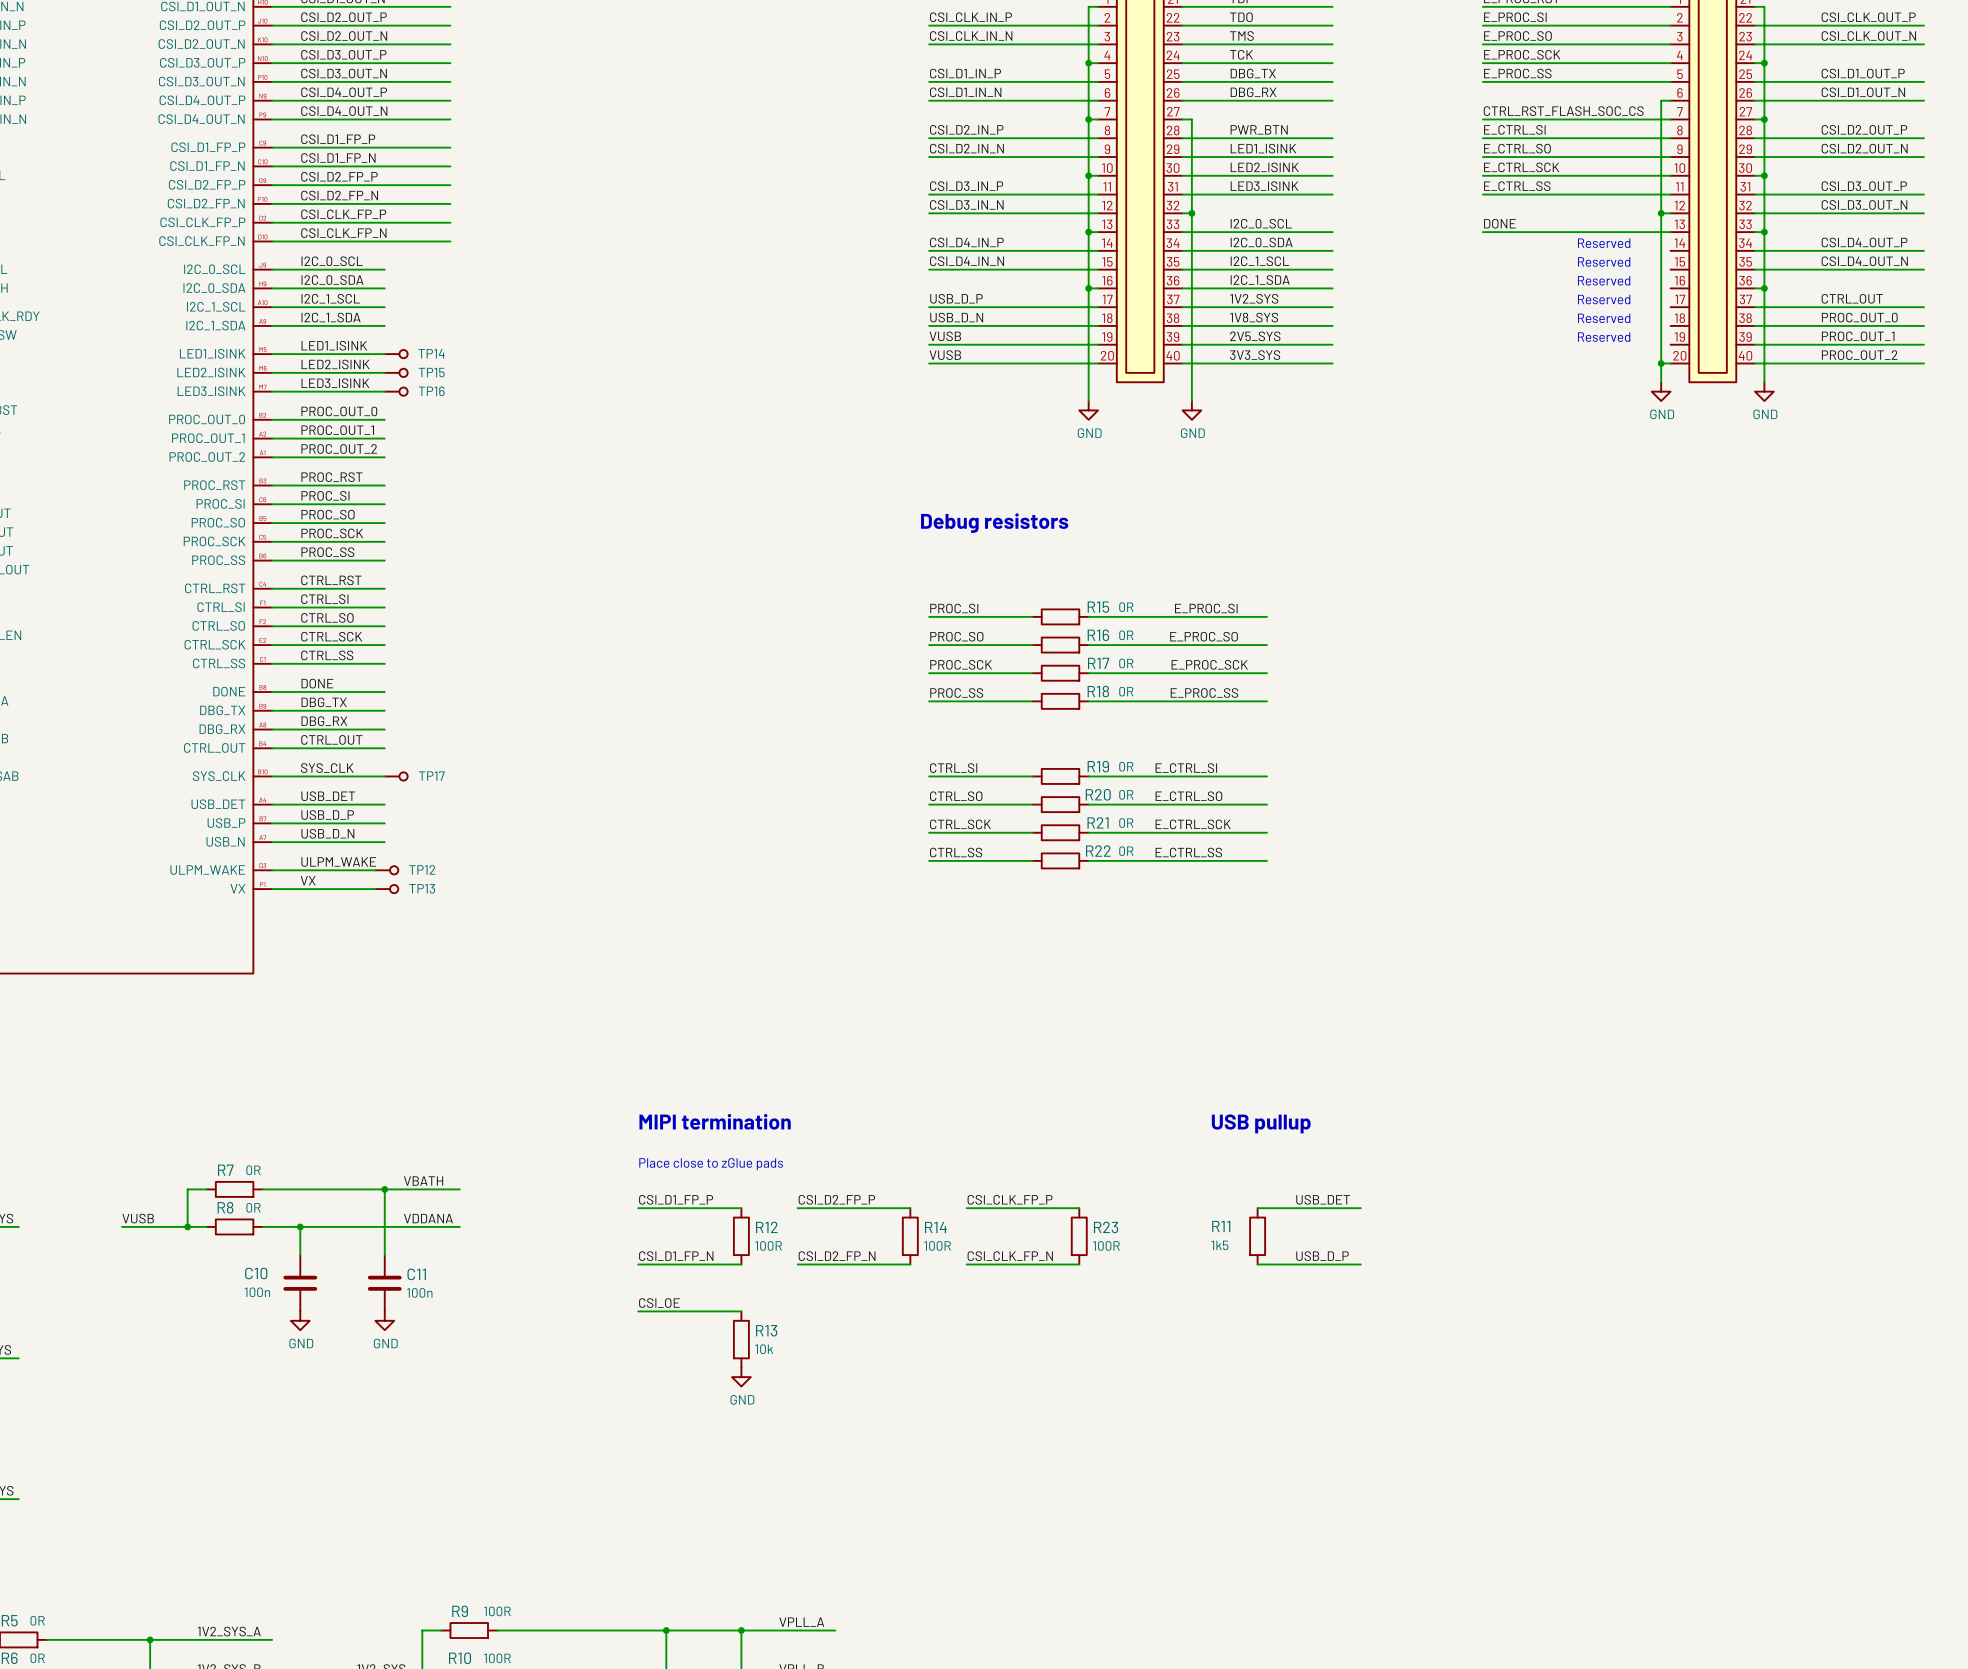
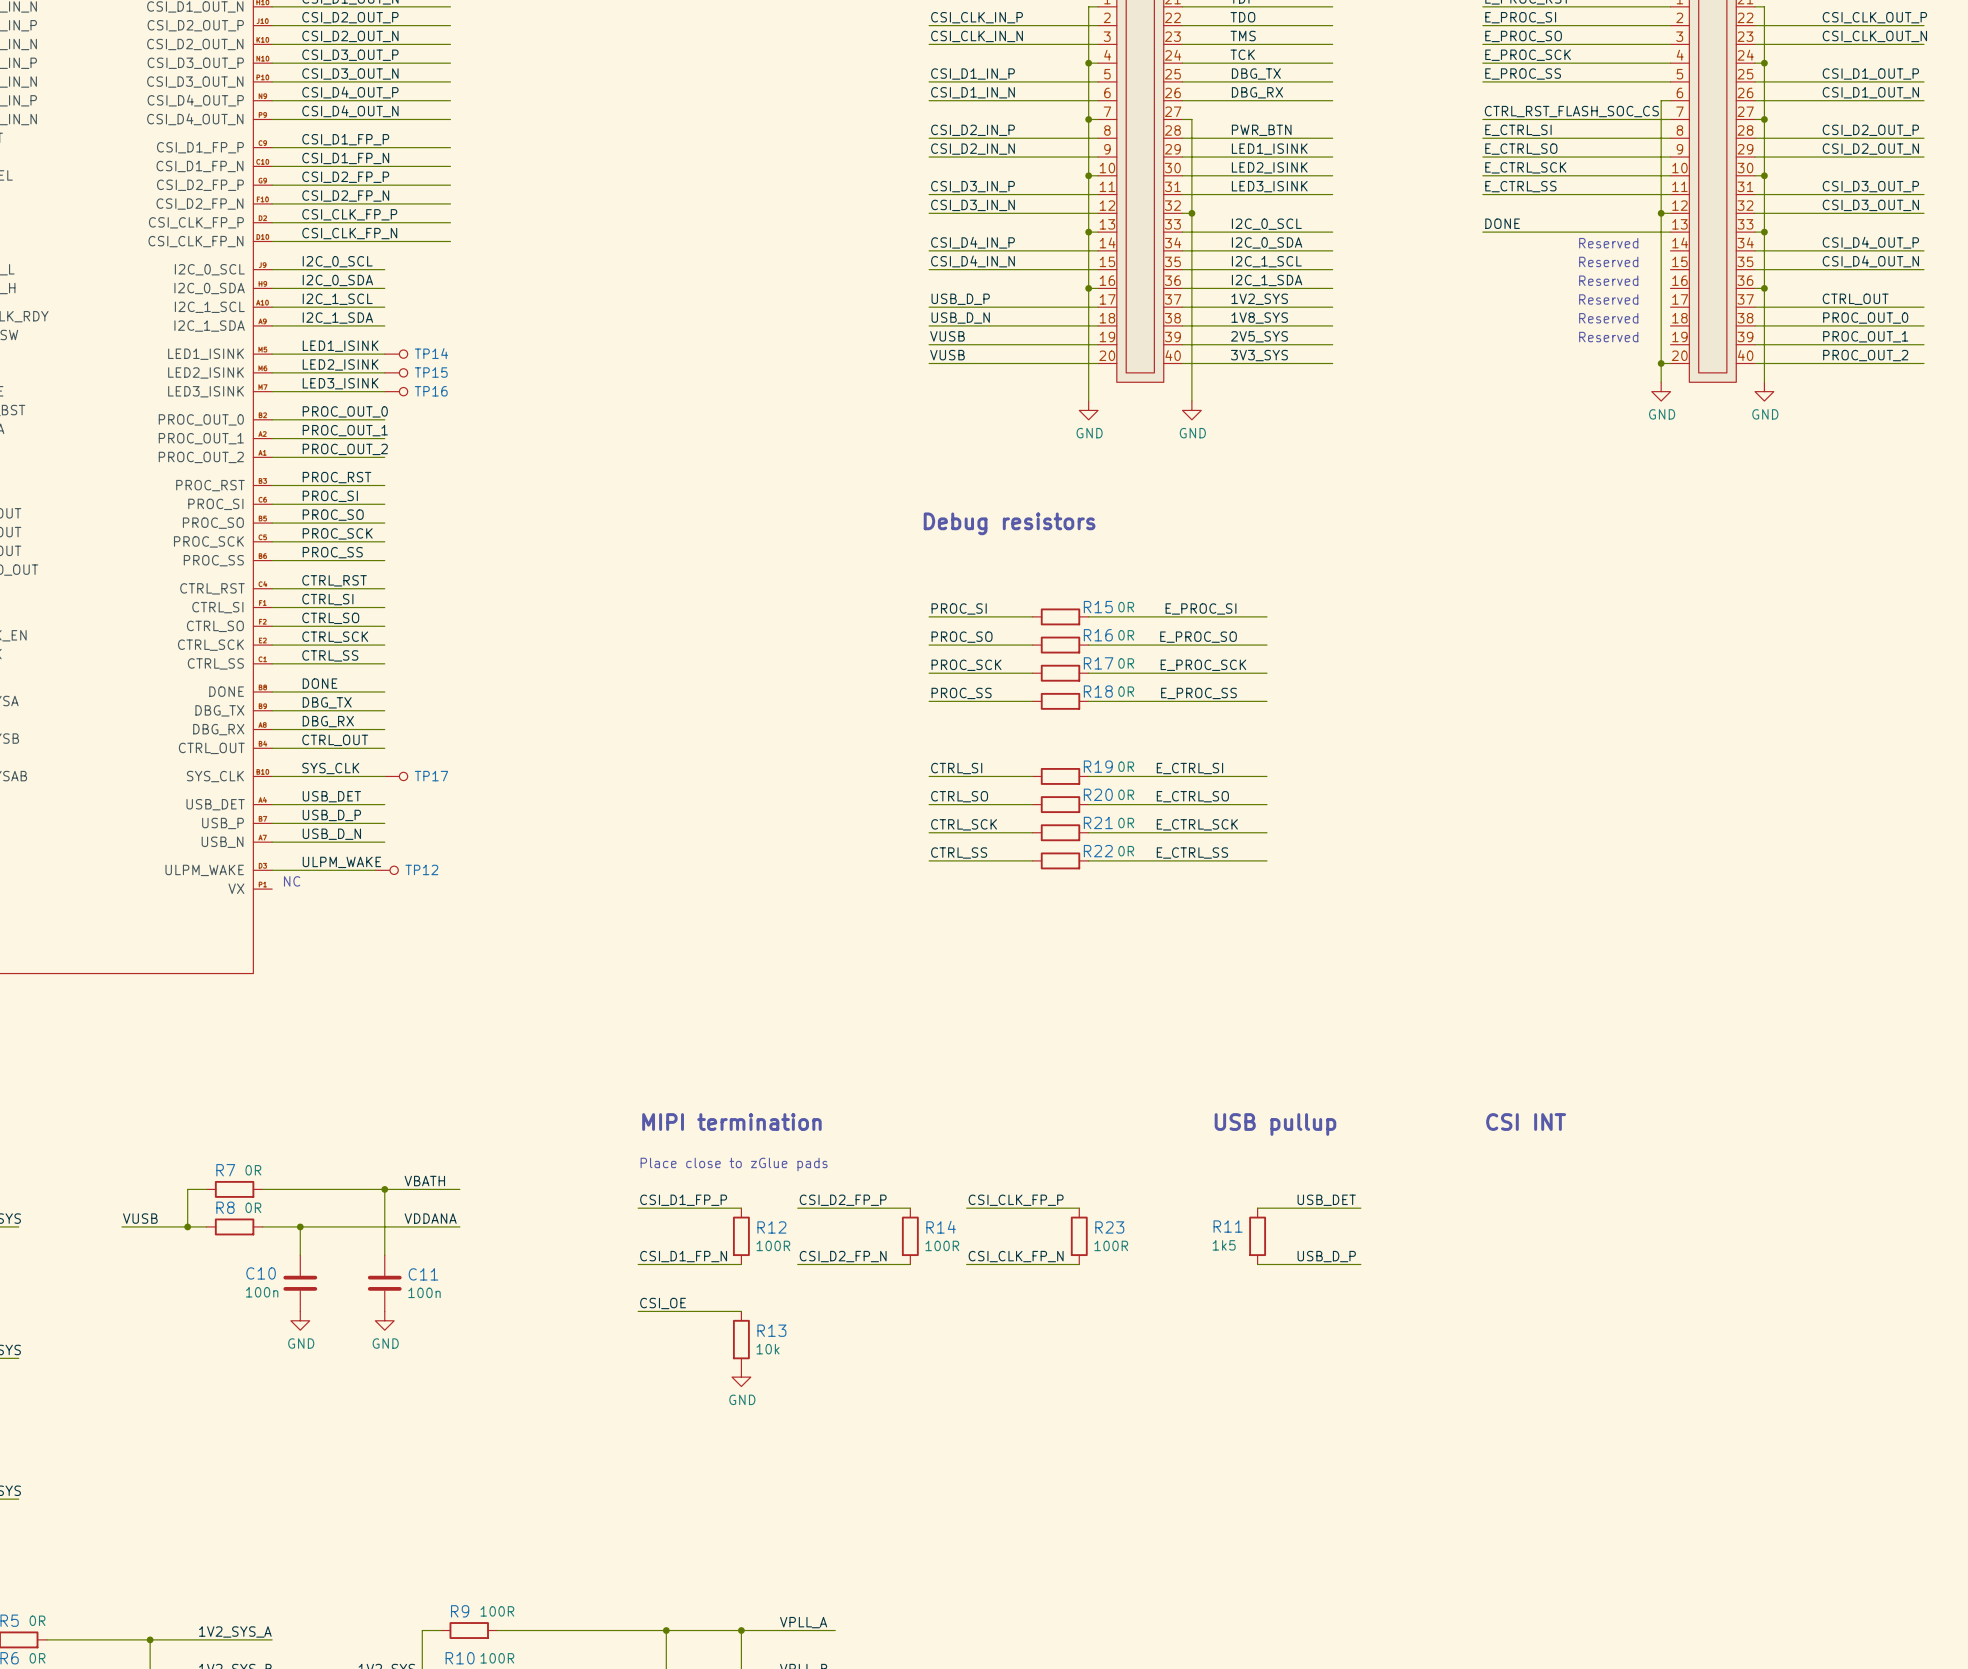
label: VX (308, 880) -> none
text: none -> NC (292, 881)
wire: (272, 889) (375, 889) -> none
TP13: (386, 889) -> none
text: none -> CSI INT (1526, 1122)

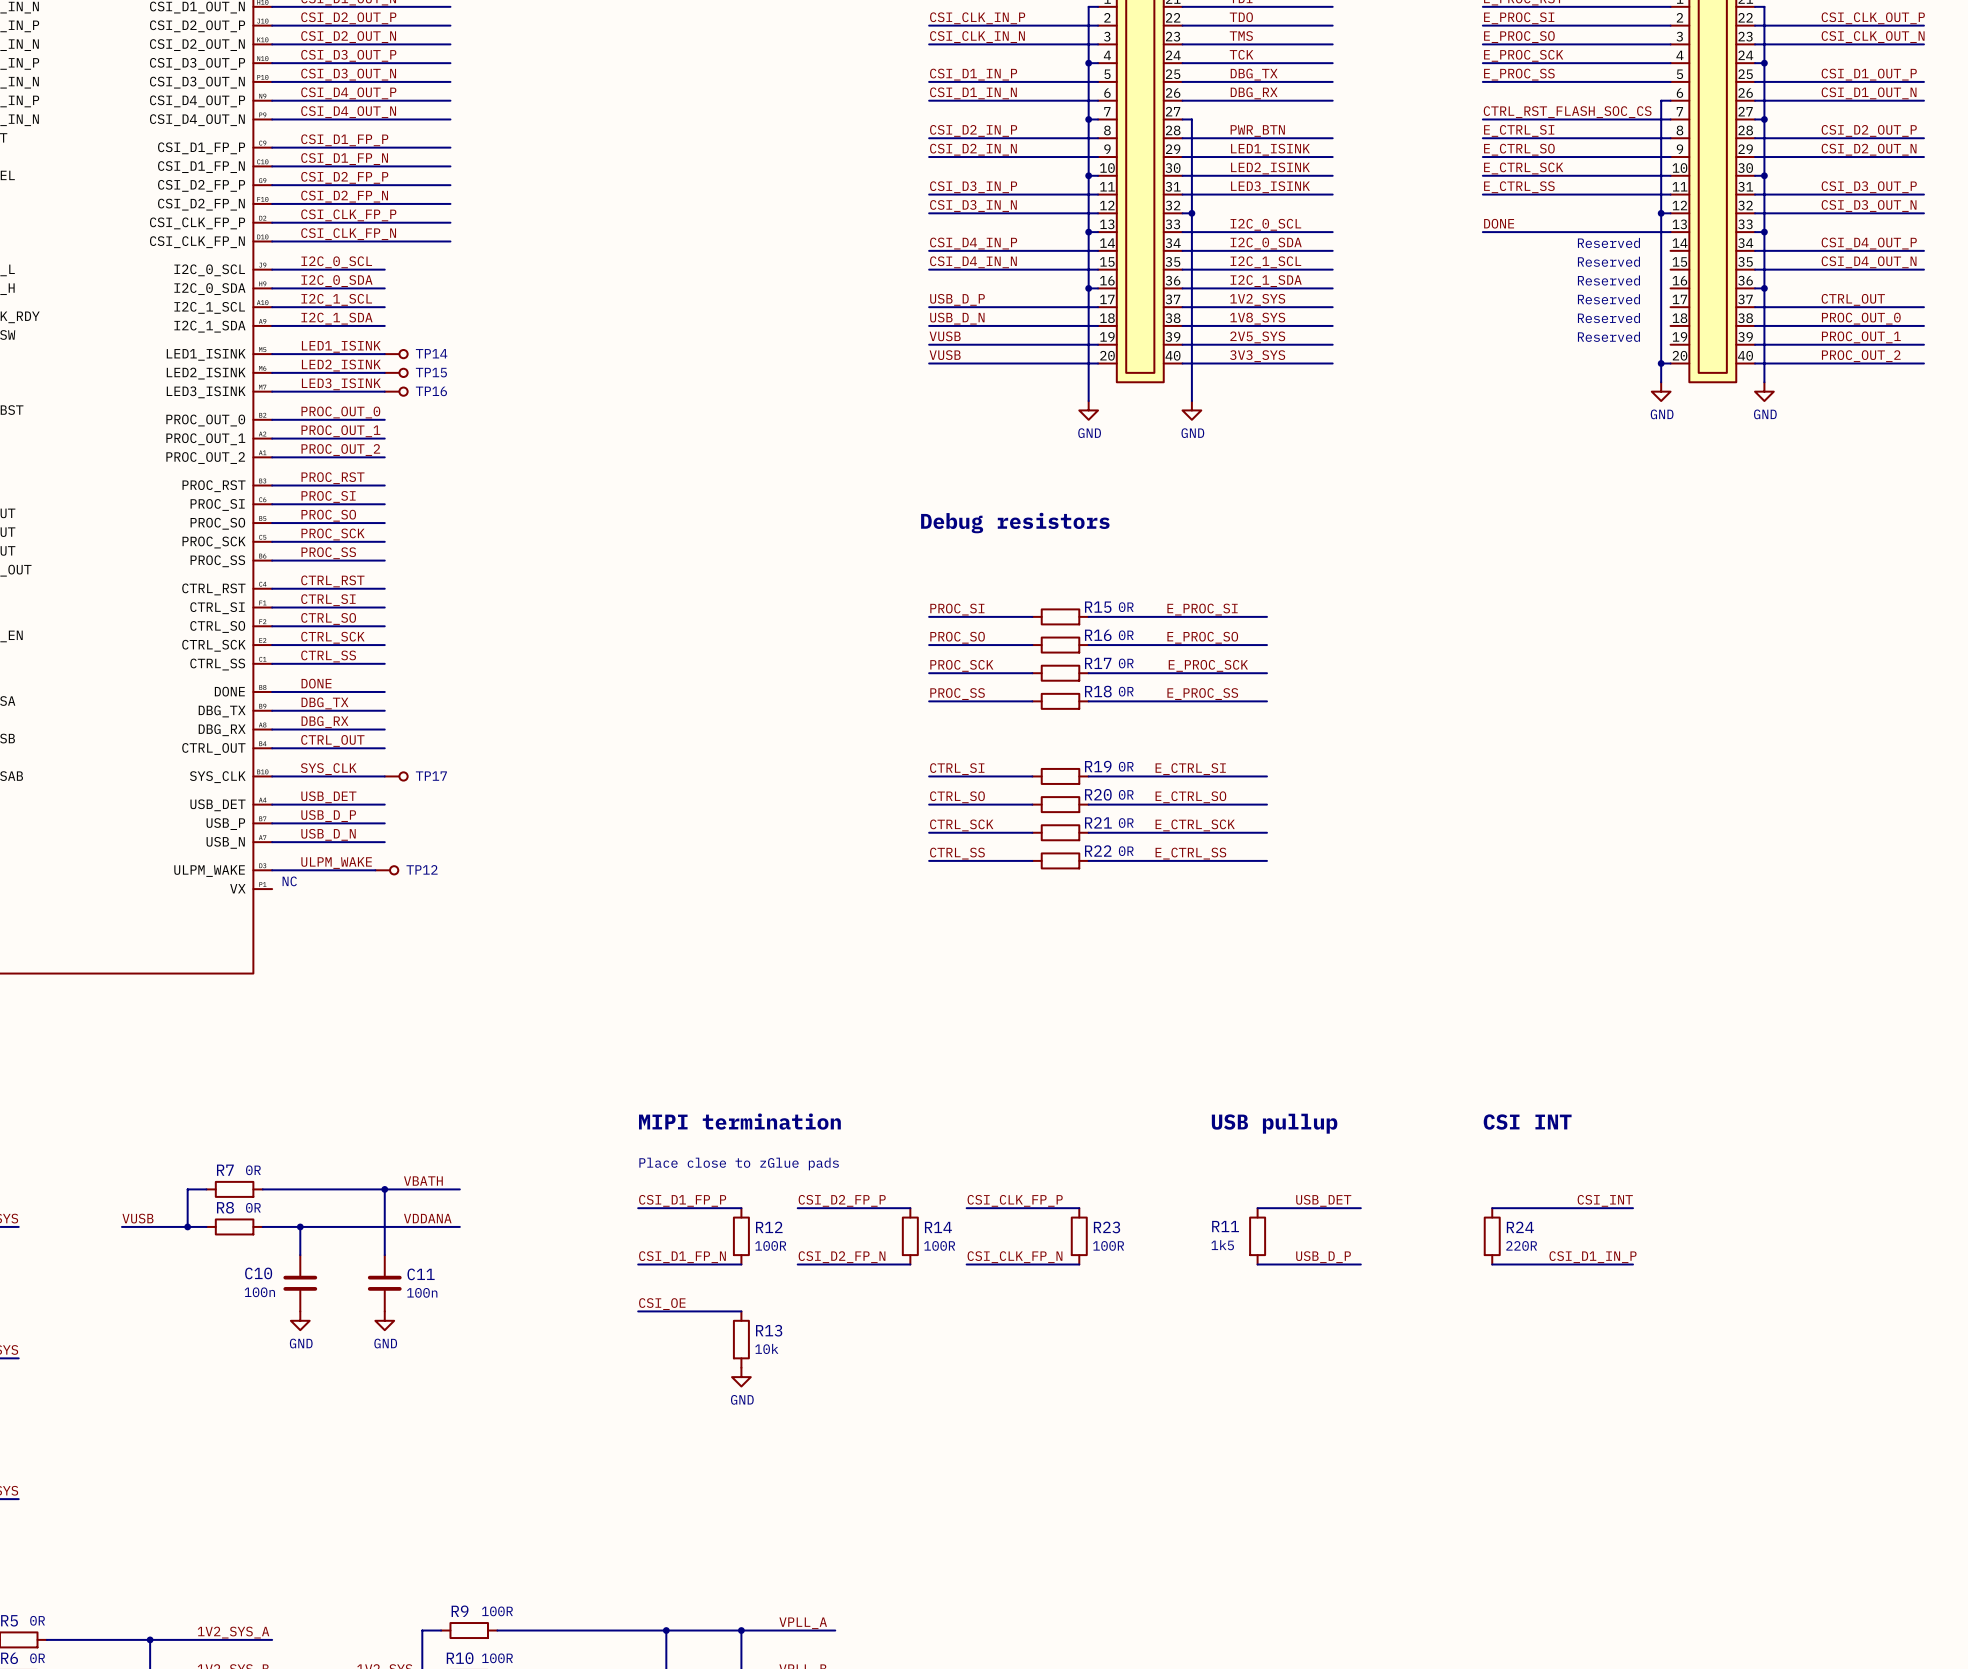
label: none -> CSI_INT (1605, 1200)
wire: none -> (1492, 1208) (1633, 1208)
R24: none -> (1492, 1236)
label: none -> CSI_D1_IN_P (1593, 1257)
wire: none -> (1492, 1264) (1633, 1264)

